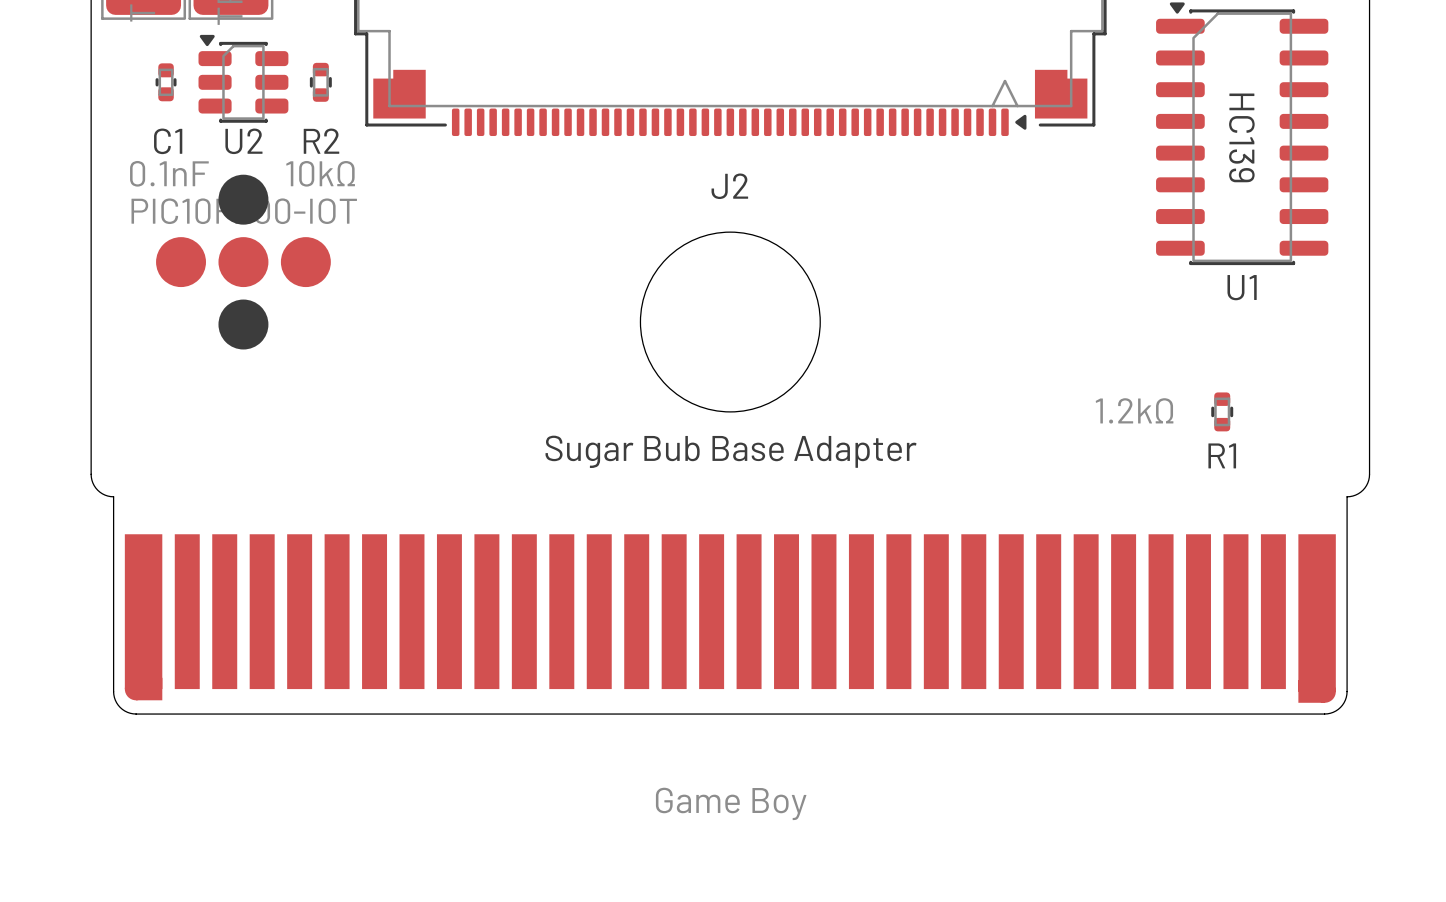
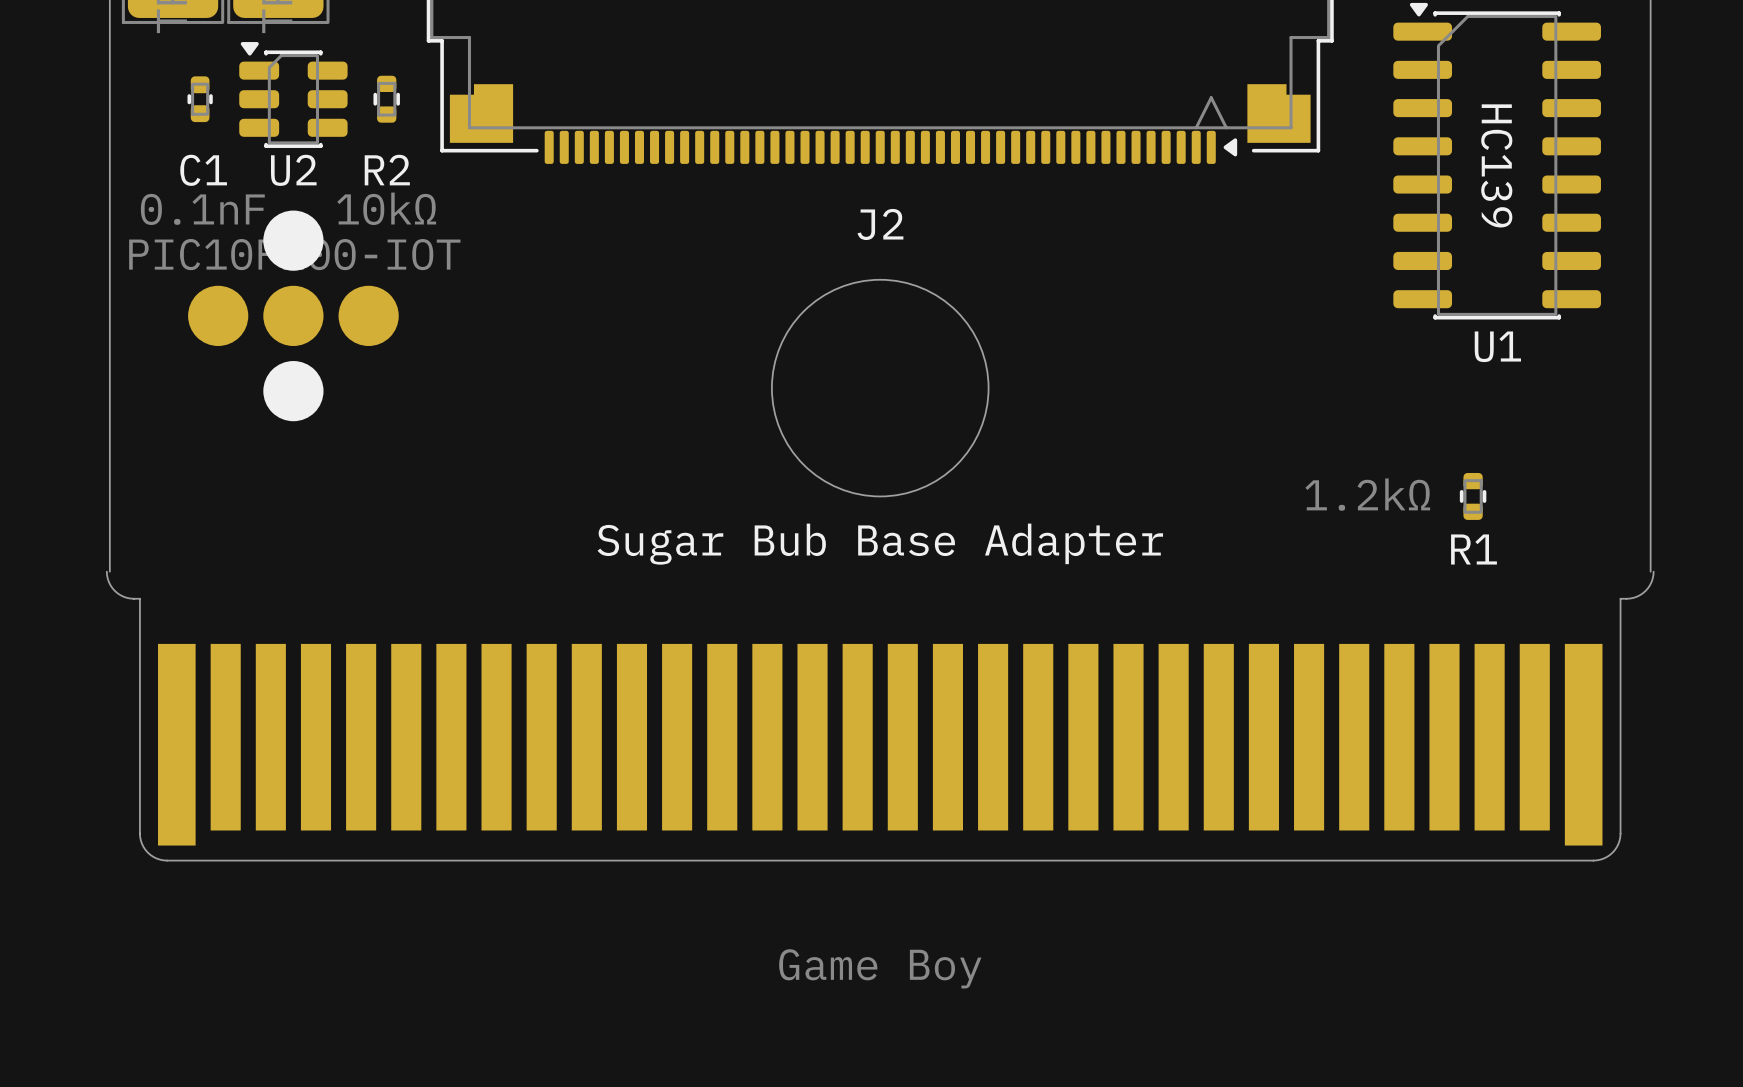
part footprint: [90, 231, 1371, 715] -> [106, 279, 1655, 862]

